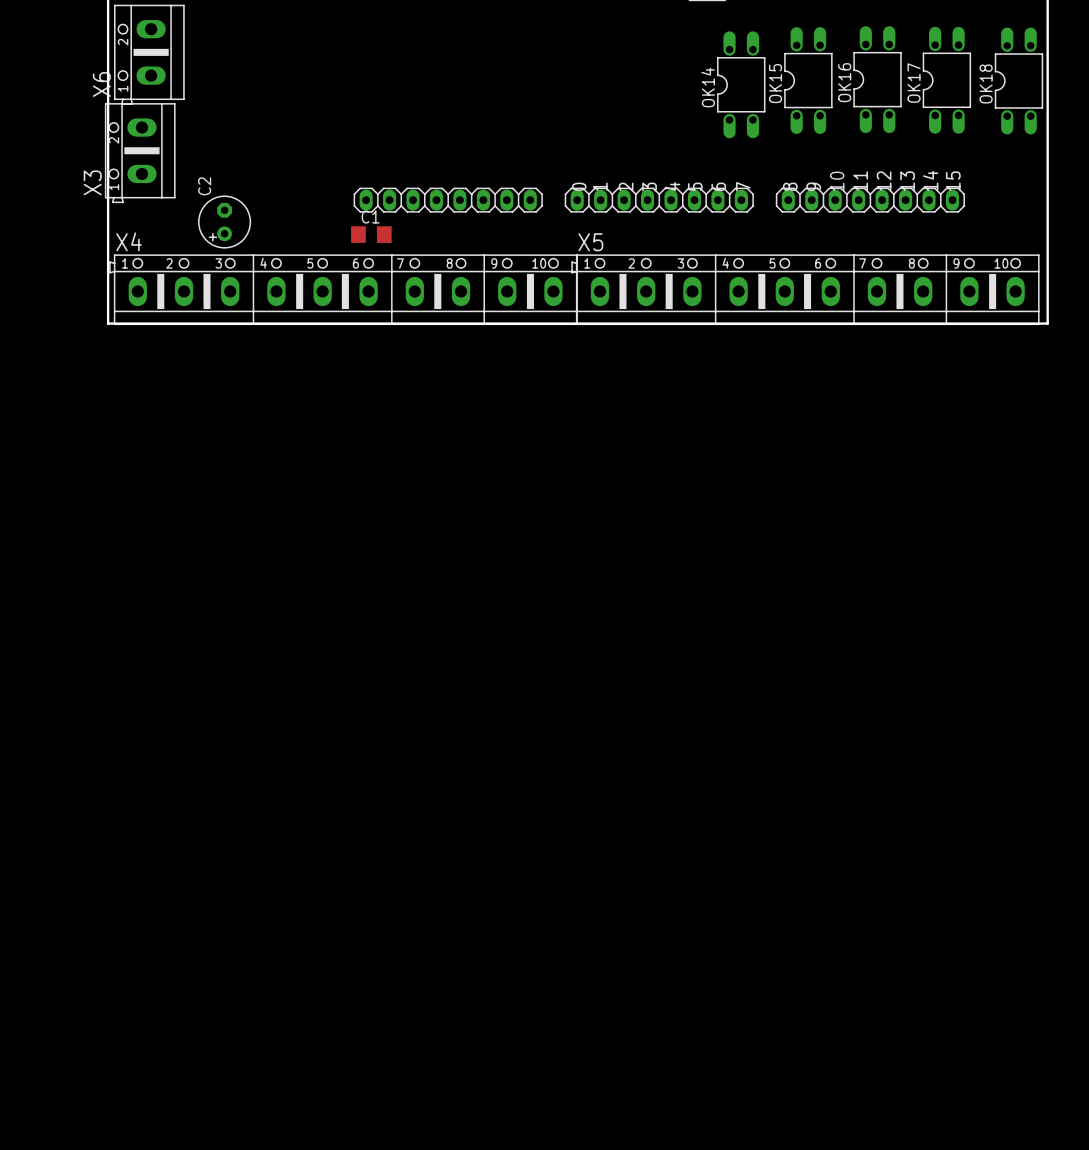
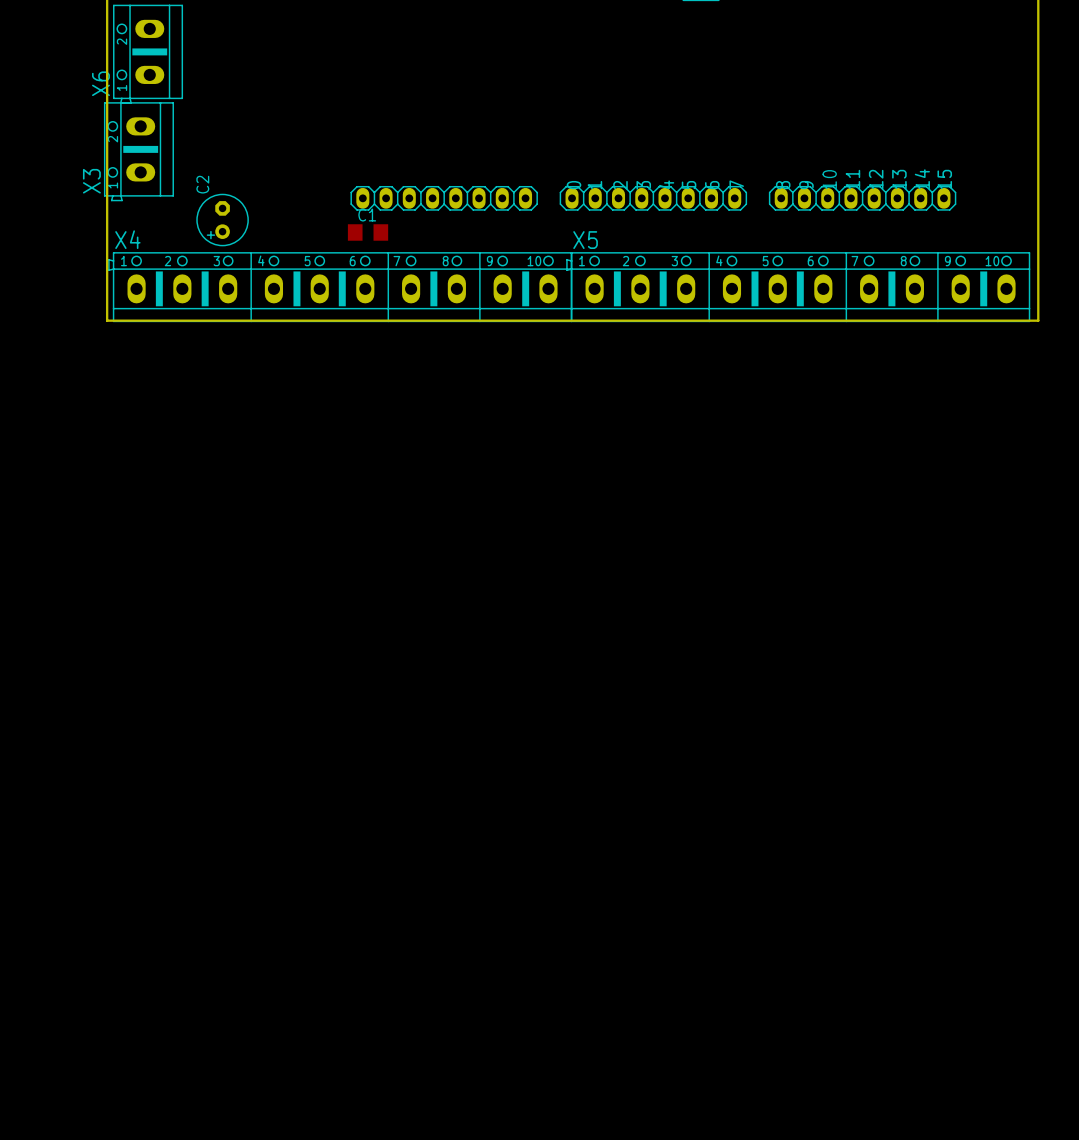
OK16: (877, 79) -> none
OK15: (808, 80) -> none
OK17: (946, 80) -> none
OK18: (1018, 81) -> none
OK14: (741, 84) -> none

